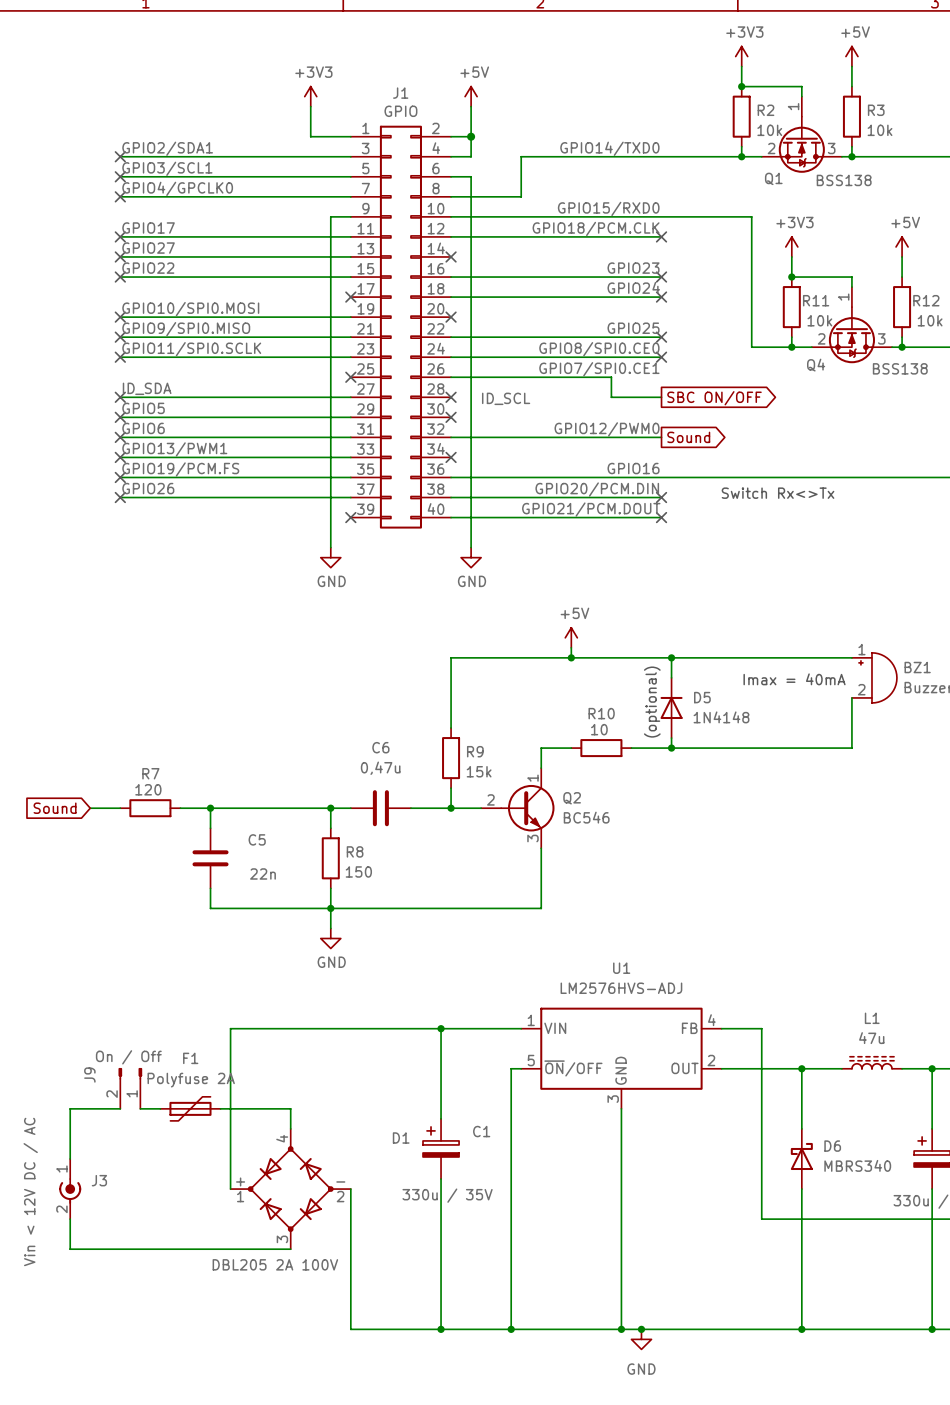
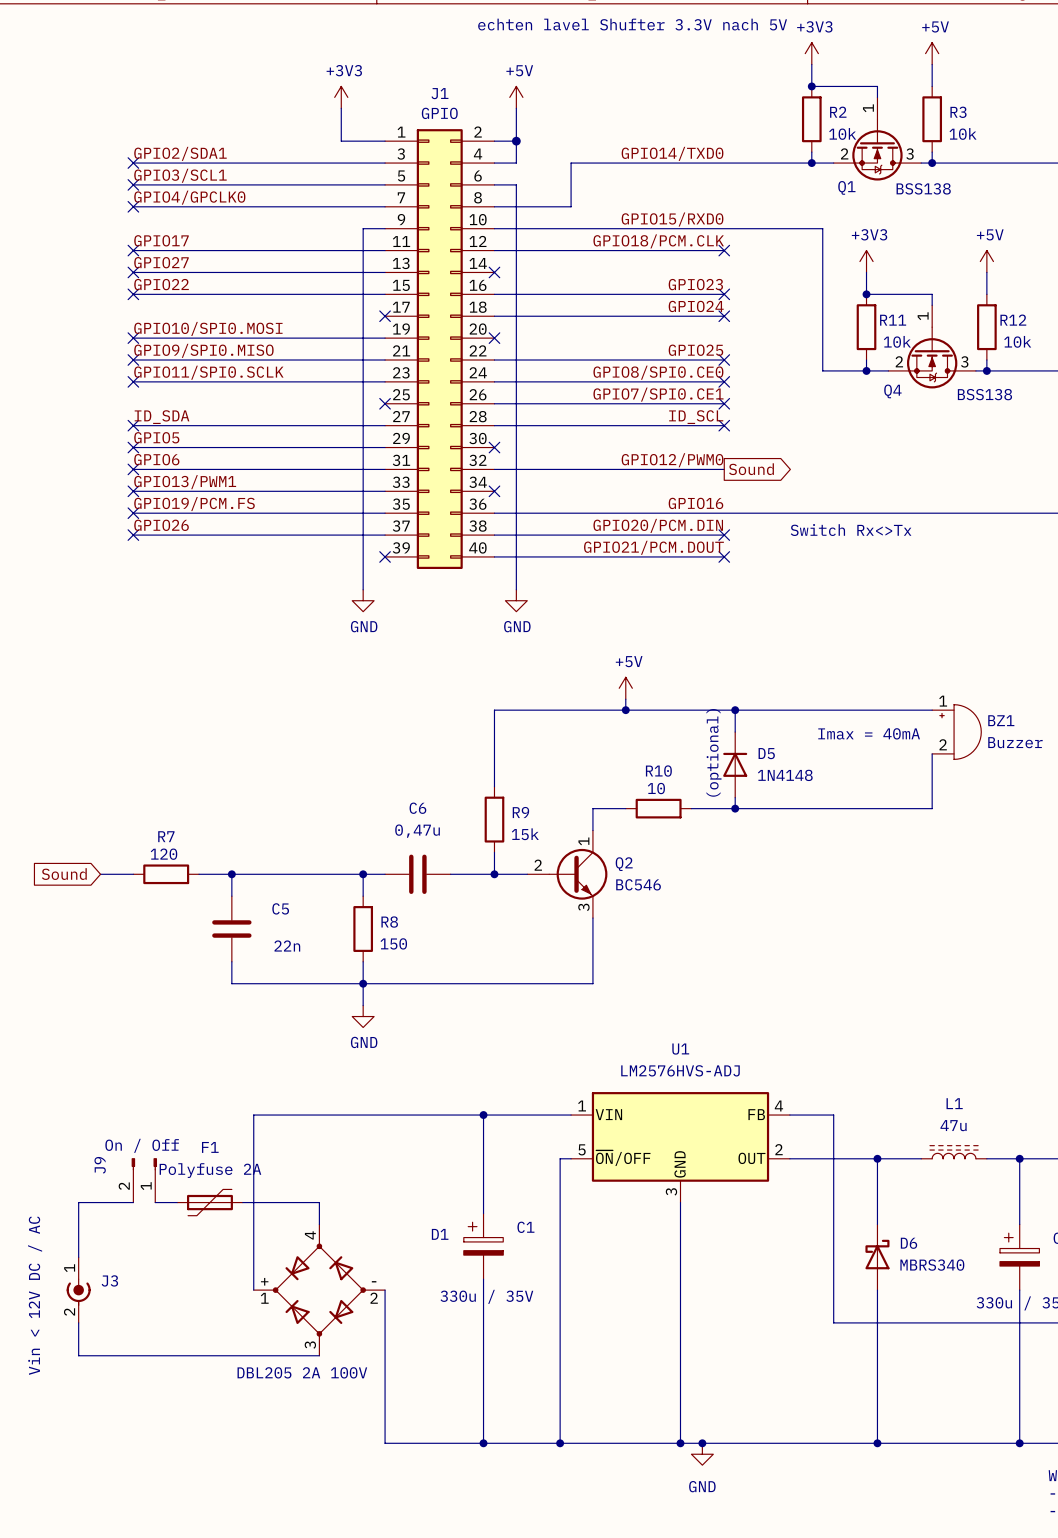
text: none -> echten lavel Shufter 3.3V nach 5V (632, 24)
wire: (611, 377) (611, 397) -> (669, 403) (724, 403)
no-connect mark: none -> (724, 403)
wire: none -> (494, 425) (669, 425)
no-connect mark: (451, 397) -> none
no-connect mark: none -> (724, 425)
label position: ID_SCL (506, 398) -> ID_SCL (696, 417)
global label: SBC ON/OFF (714, 398) -> none

